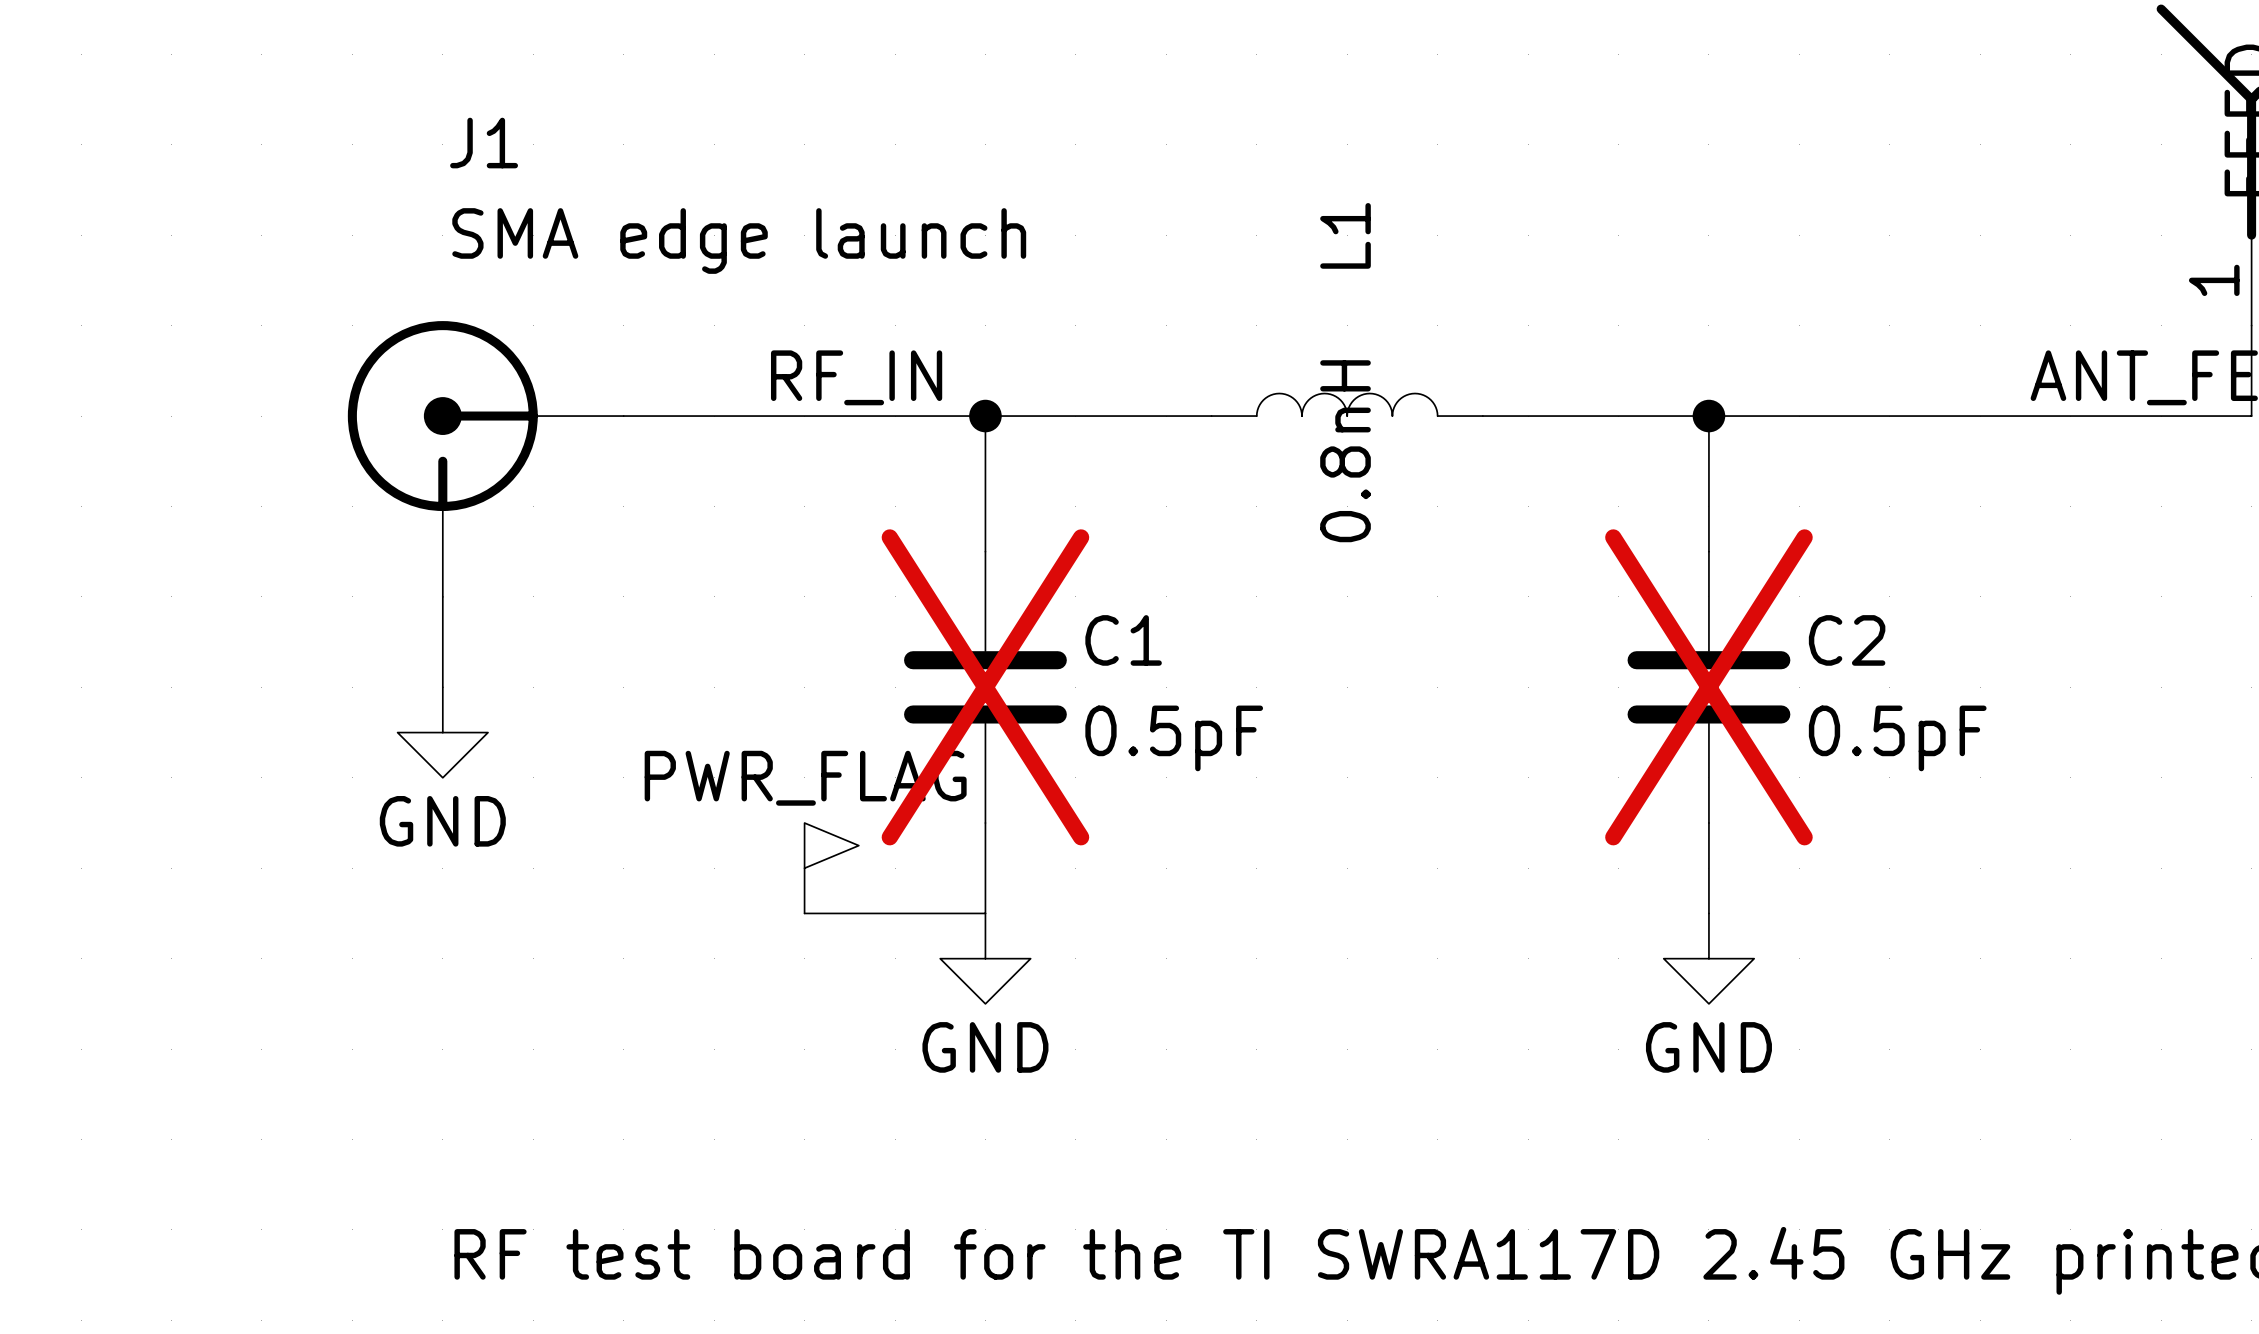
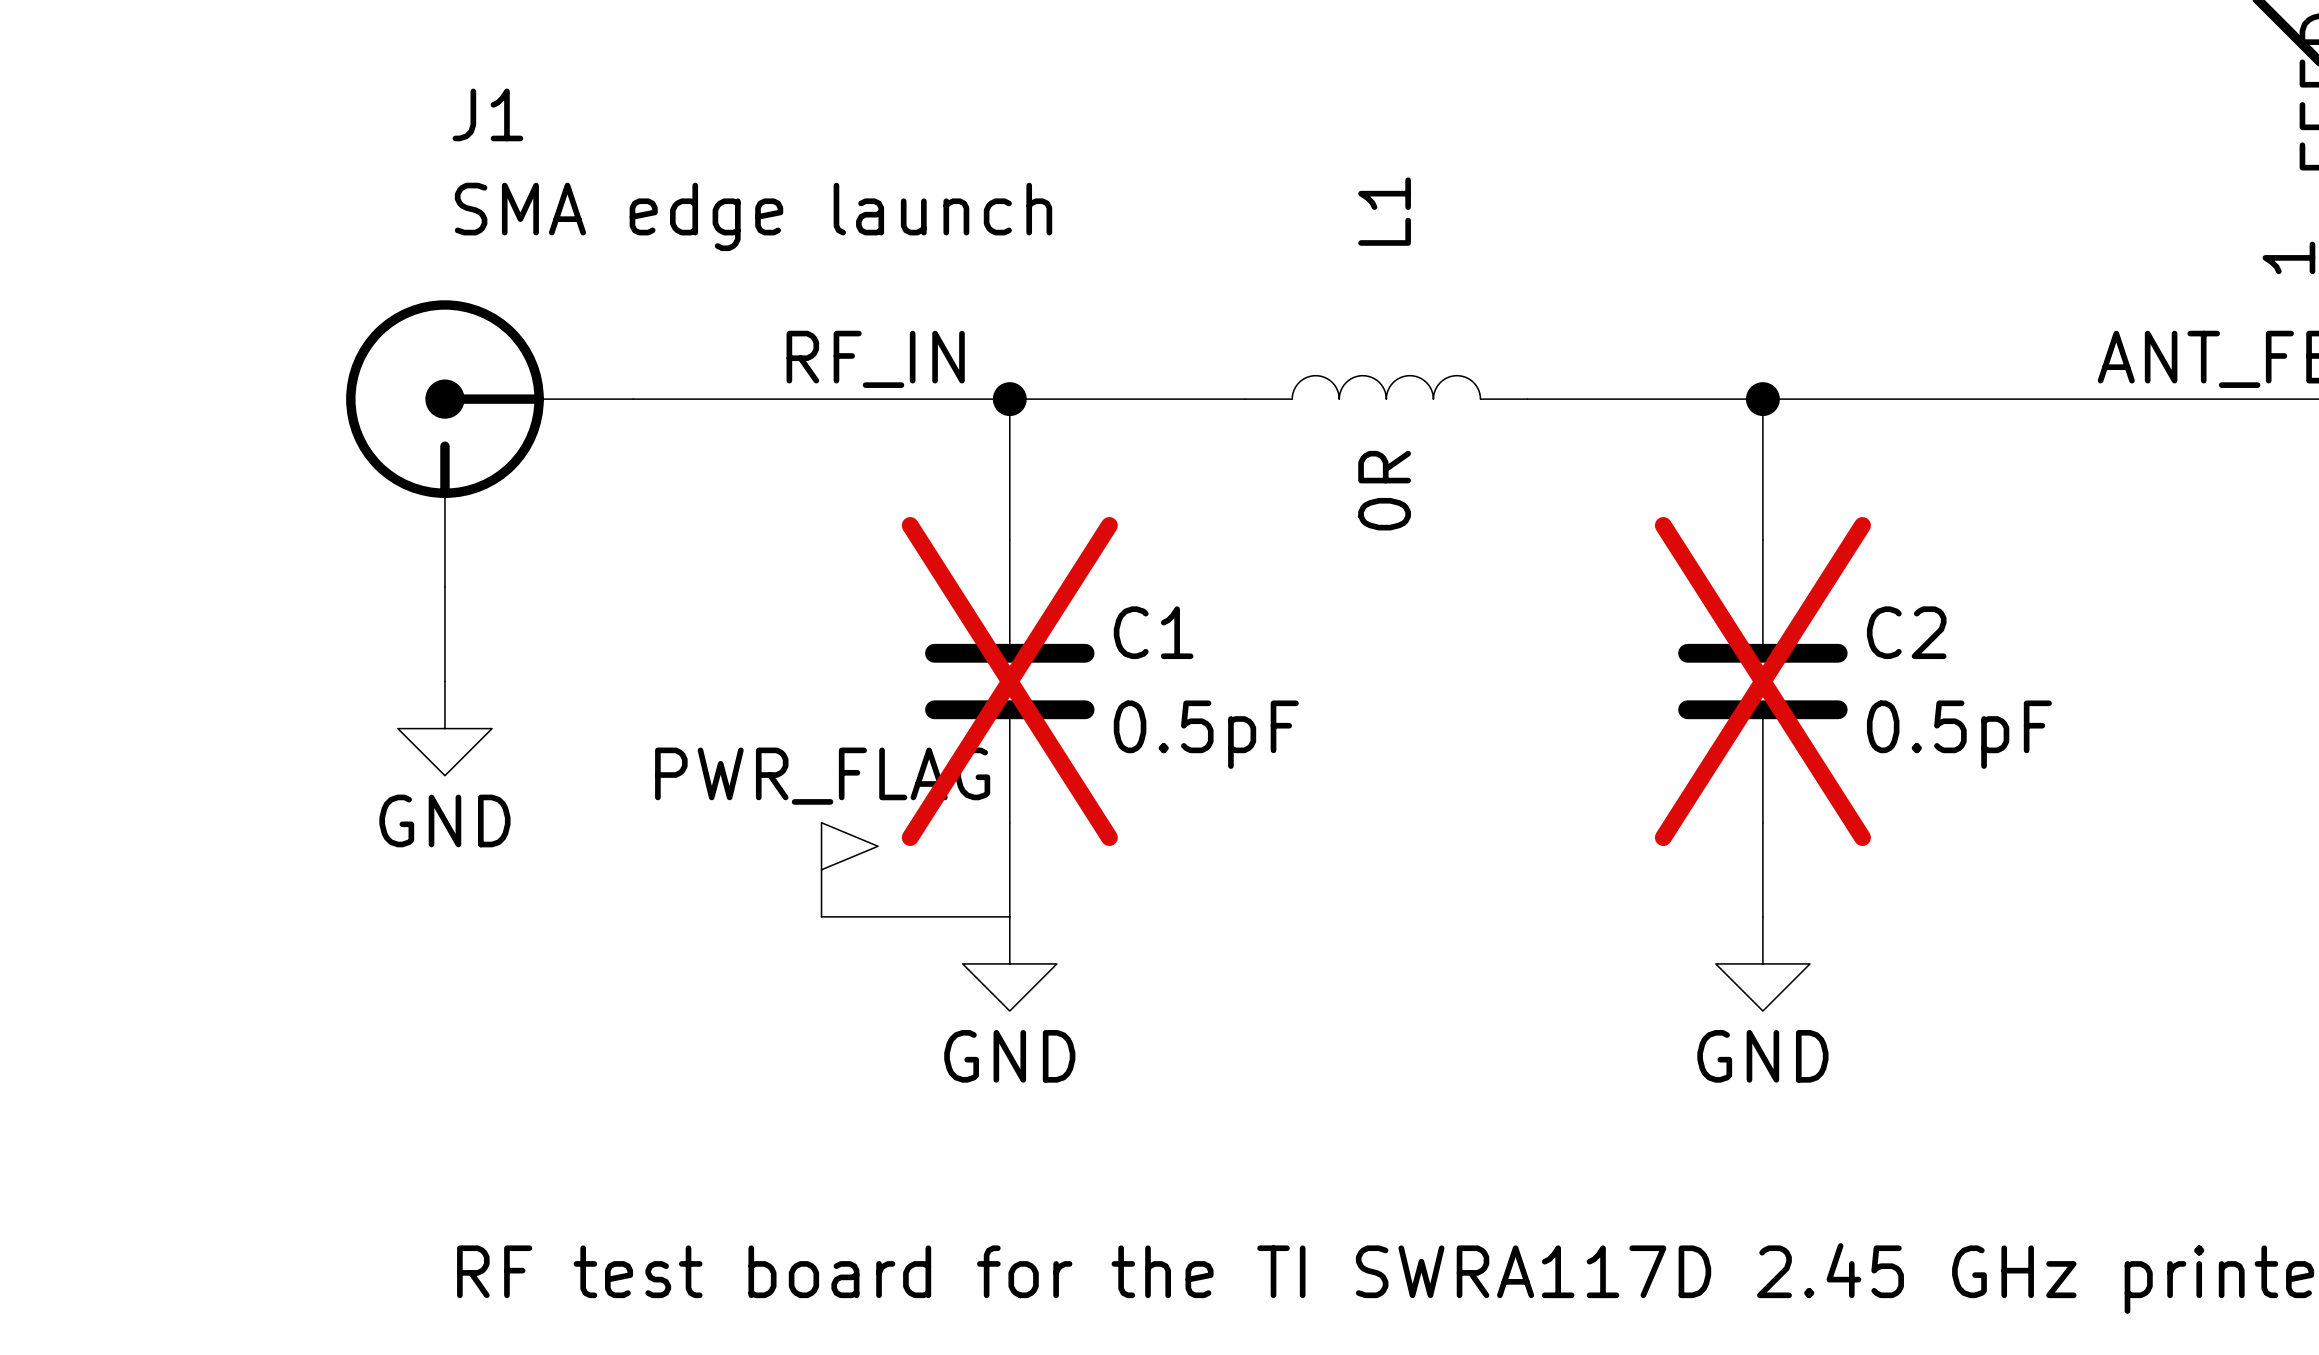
L1 value: 0.8nH (1345, 451) -> 0R (1384, 490)

